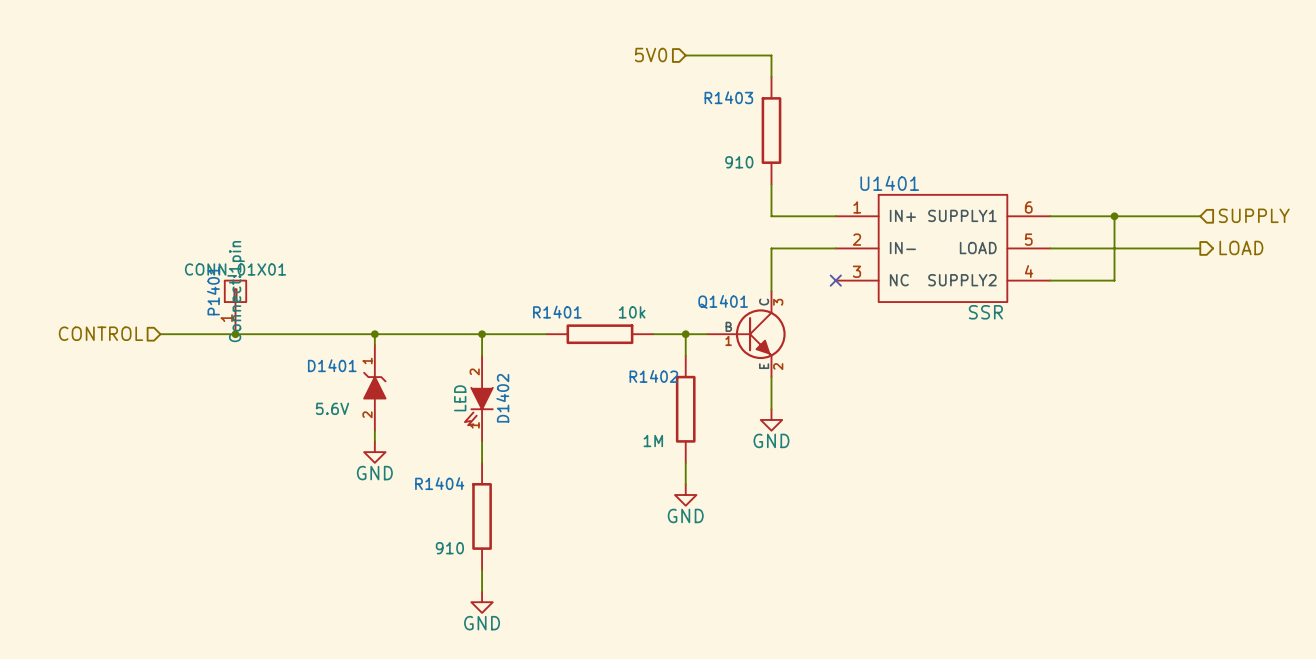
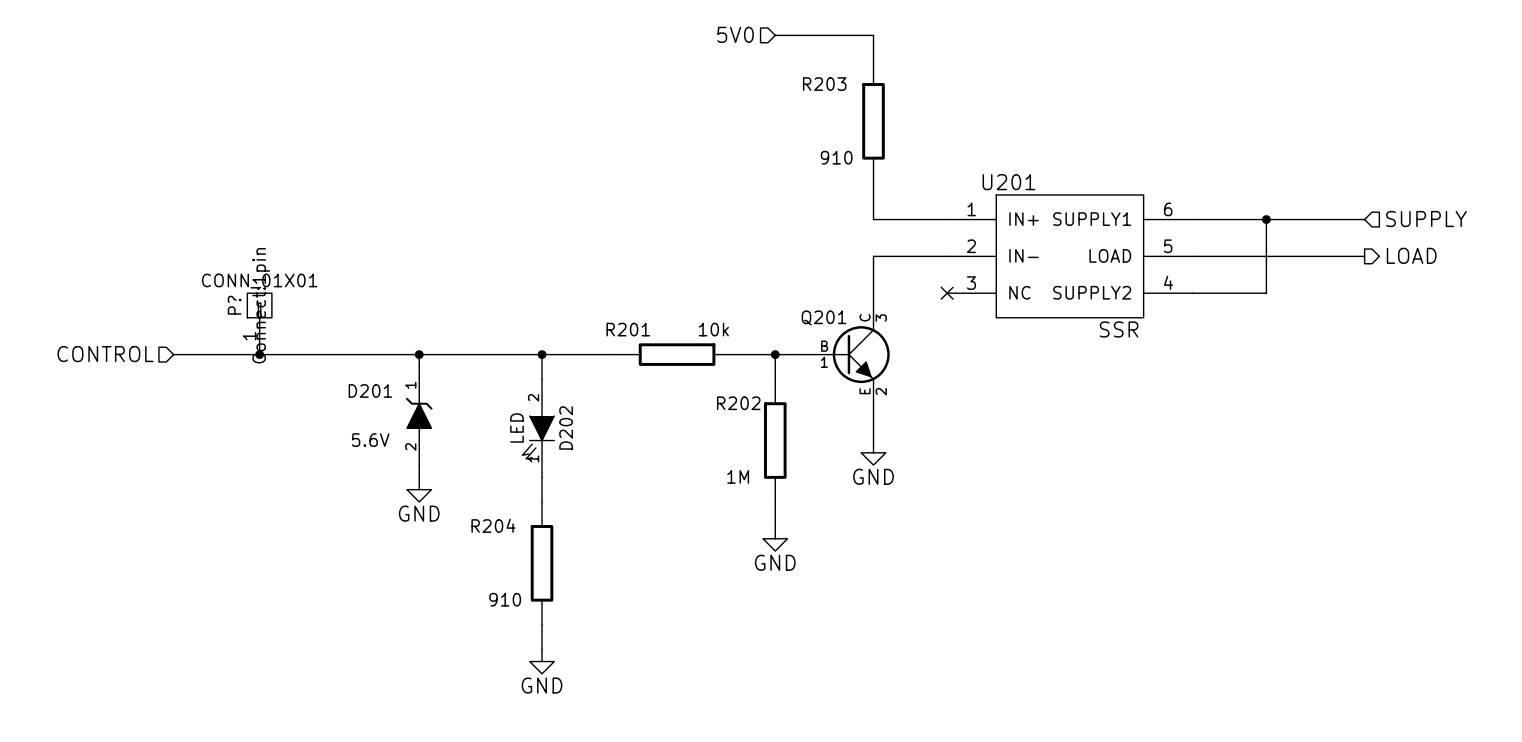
R1403 name: R1403 (728, 97) -> R203 (824, 84)
U1401 name: U1401 (889, 183) -> U201 (1008, 182)
P1401 name: P1401 (213, 291) -> P? (234, 305)
Q1401 name: Q1401 (723, 301) -> Q201 (824, 317)
R1401 name: R1401 (557, 312) -> R201 (628, 329)
D1401 name: D1401 (332, 365) -> D201 (370, 390)
R1402 name: R1402 (653, 376) -> R202 (738, 403)
D1402 name: D1402 (502, 398) -> D202 (566, 427)
R1404 name: R1404 (439, 483) -> R204 (493, 525)

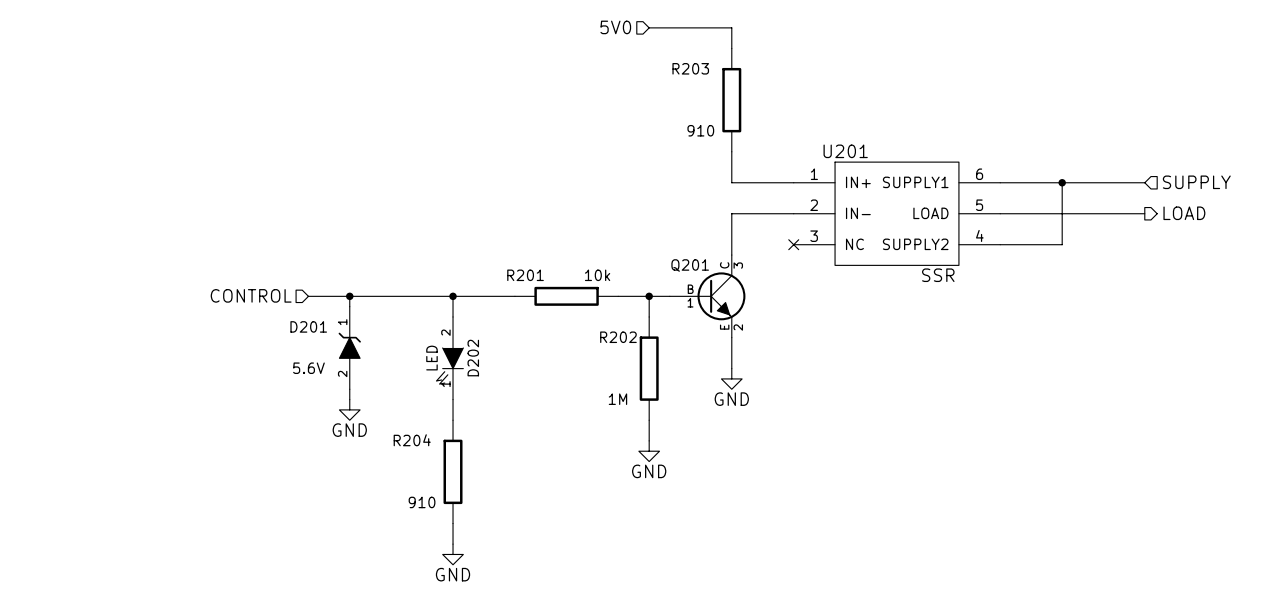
P?: CONN_01X01 (259, 323) -> none
hierarchical label position: CONTROL (105, 354) -> CONTROL (251, 295)
wire: (173, 354) (370, 354) -> none
junction: (259, 354) -> none

